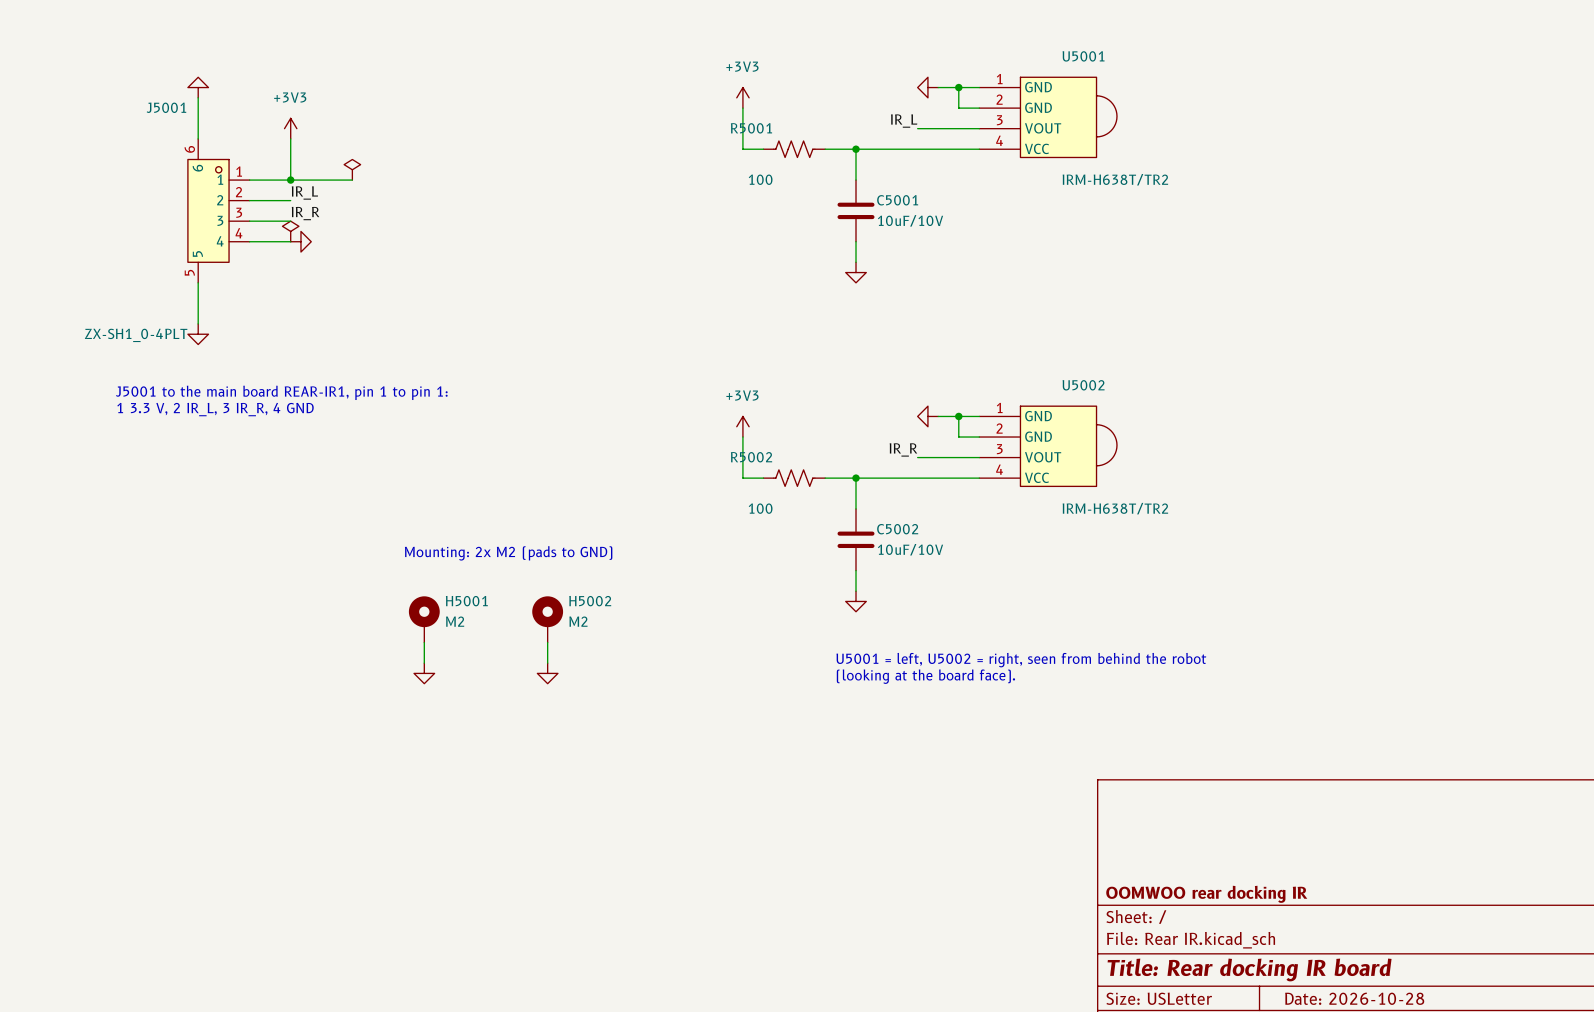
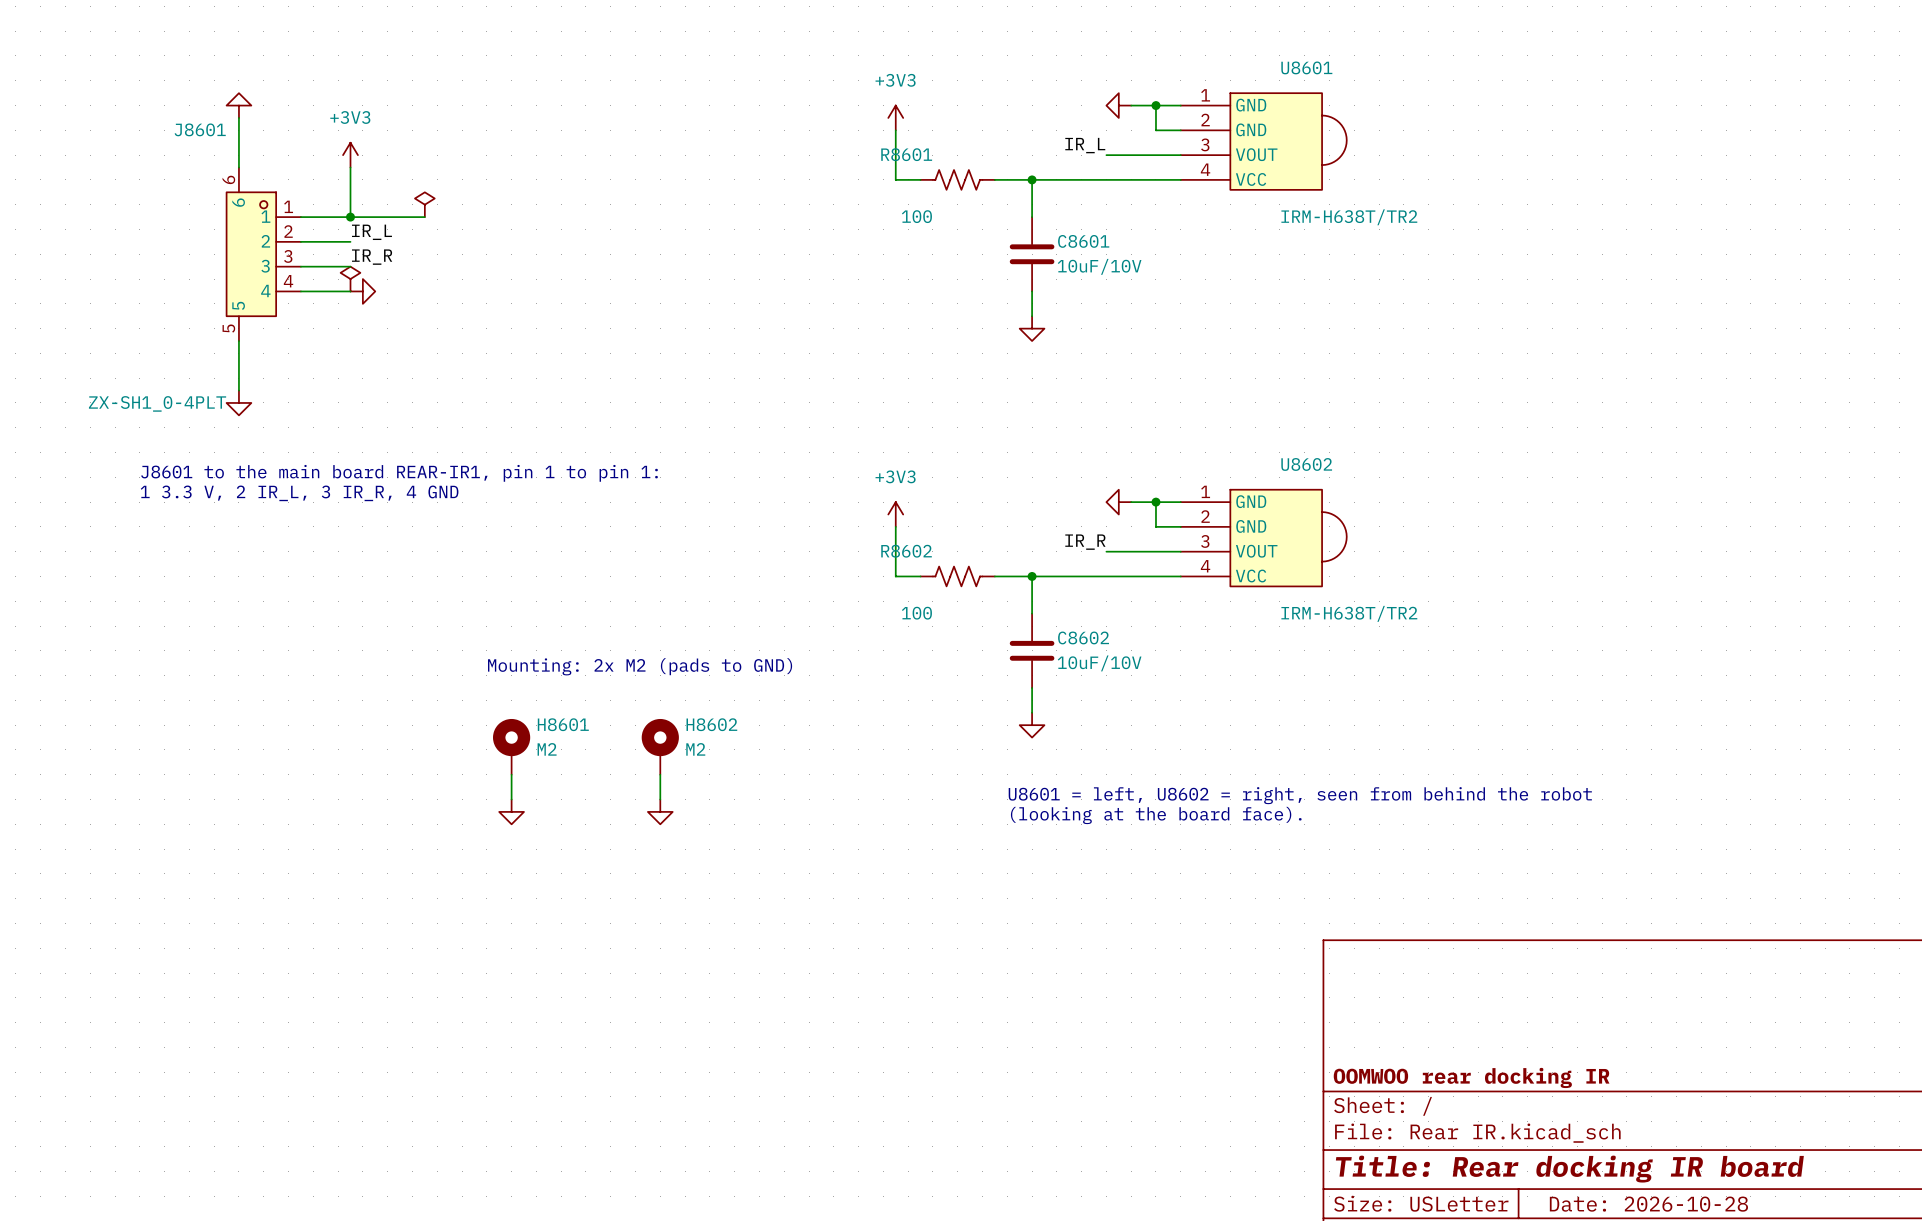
U5001 name: U5001 (1083, 56) -> U8601 (1306, 67)
J5001 name: J5001 (166, 107) -> J8601 (200, 129)
R5001 name: R5001 (751, 128) -> R8601 (906, 154)
C5001 name: C5001 (897, 200) -> C8601 (1083, 241)
U5002 name: U5002 (1083, 385) -> U8602 (1306, 464)
text: J5001 to the main board REAR-IR1, pin 1 to pin 1: (281, 392) -> J8601 to the main board REAR-IR1, pin 1 to pin 1: (399, 473)
R5002 name: R5002 (751, 457) -> R8602 (906, 551)
C5002 name: C5002 (897, 529) -> C8602 (1083, 637)
H5001 name: H5001 (466, 601) -> H8601 (563, 724)
H5002 name: H5002 (590, 601) -> H8602 (711, 724)
text: U5001 = left, U5002 = right, seen from behind the robot (1021, 660) -> U8601 = left, U8602 = right, seen from behind the robot (1300, 795)

